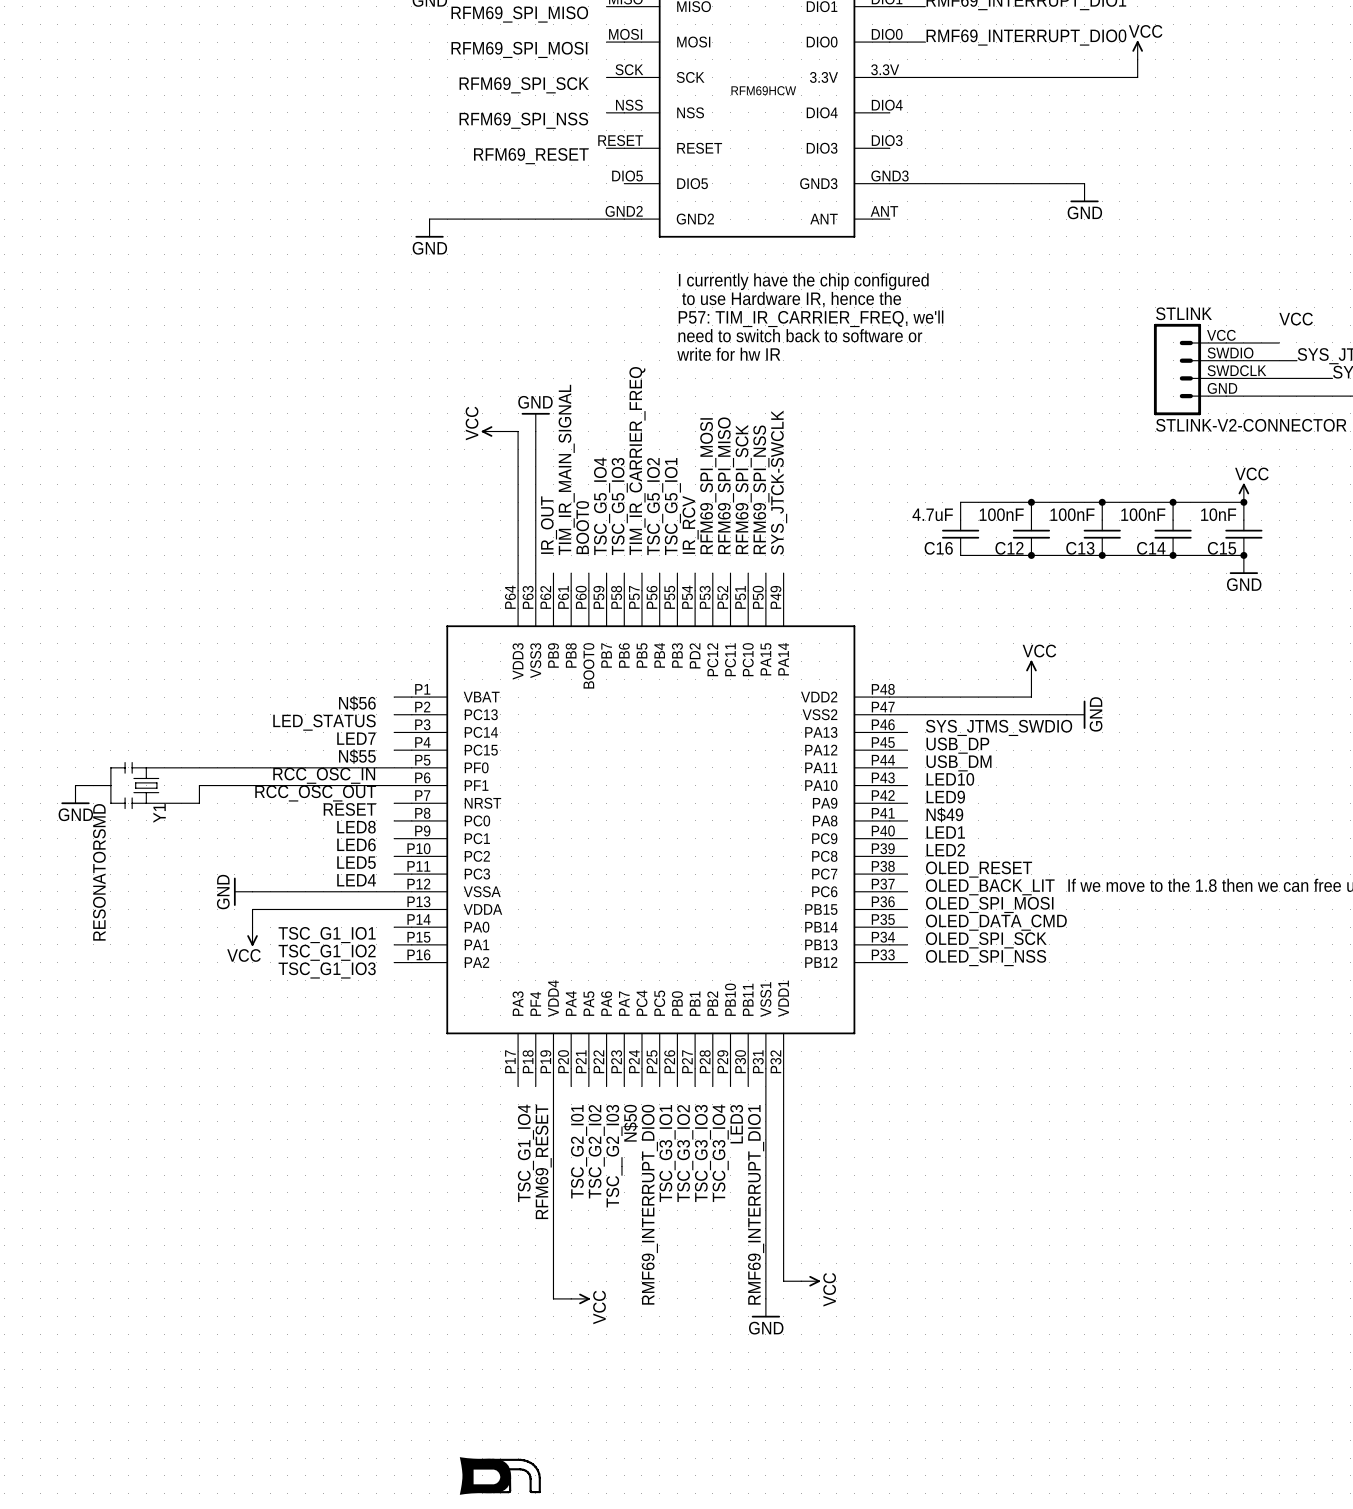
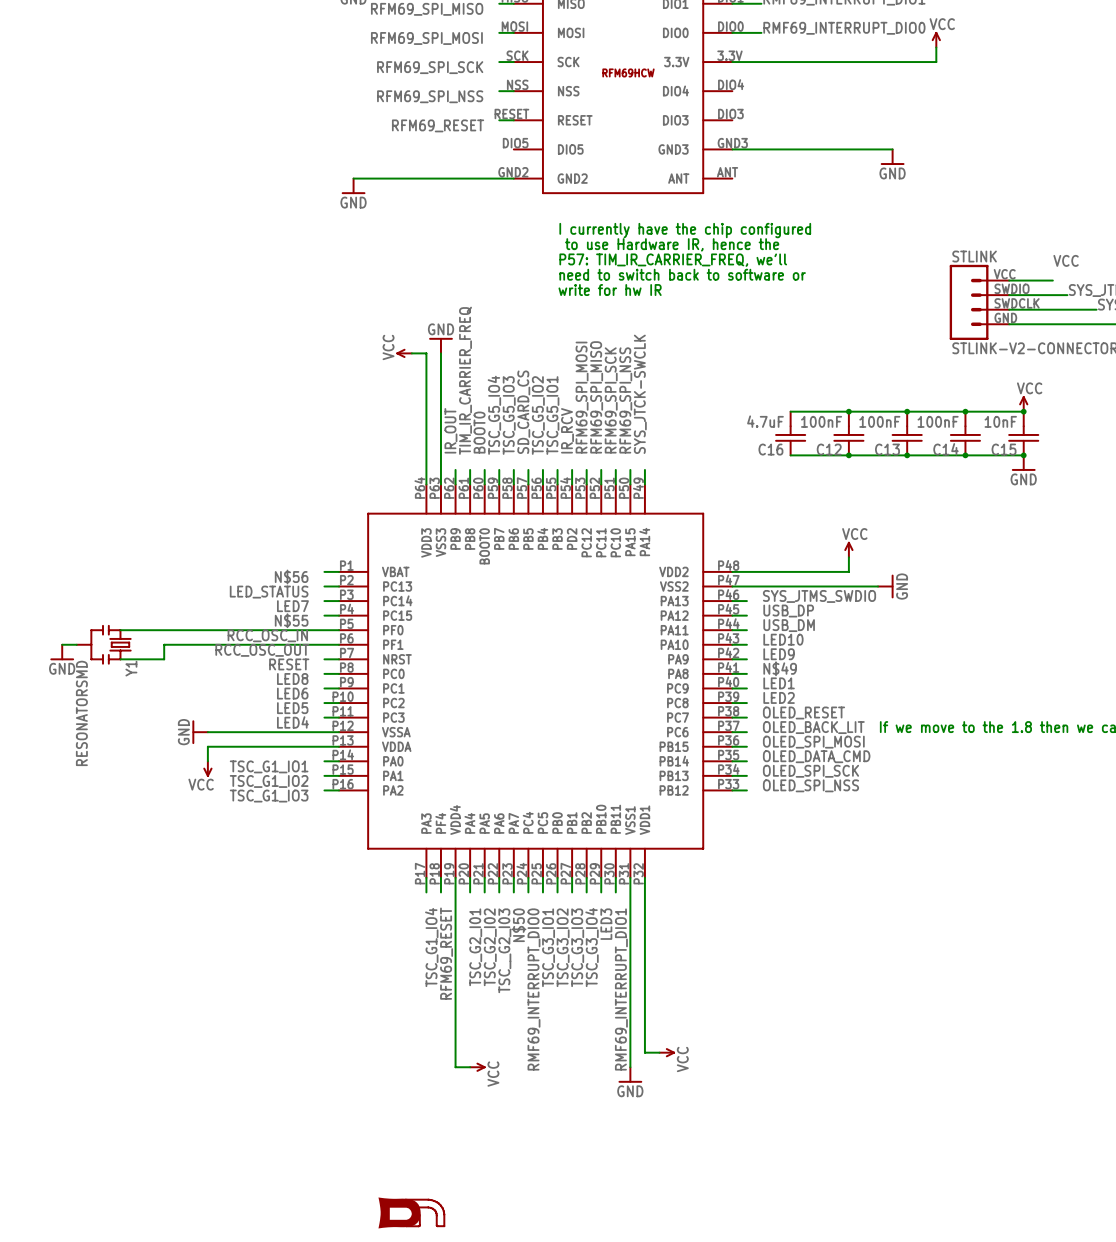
label: TIM_IR_CARRIER_FREQ (637, 461) -> SD_CARD_CS (523, 412)
label: TIM_IR_MAIN_SIGNAL (566, 469) -> TIM_IR_CARRIER_FREQ (465, 380)

